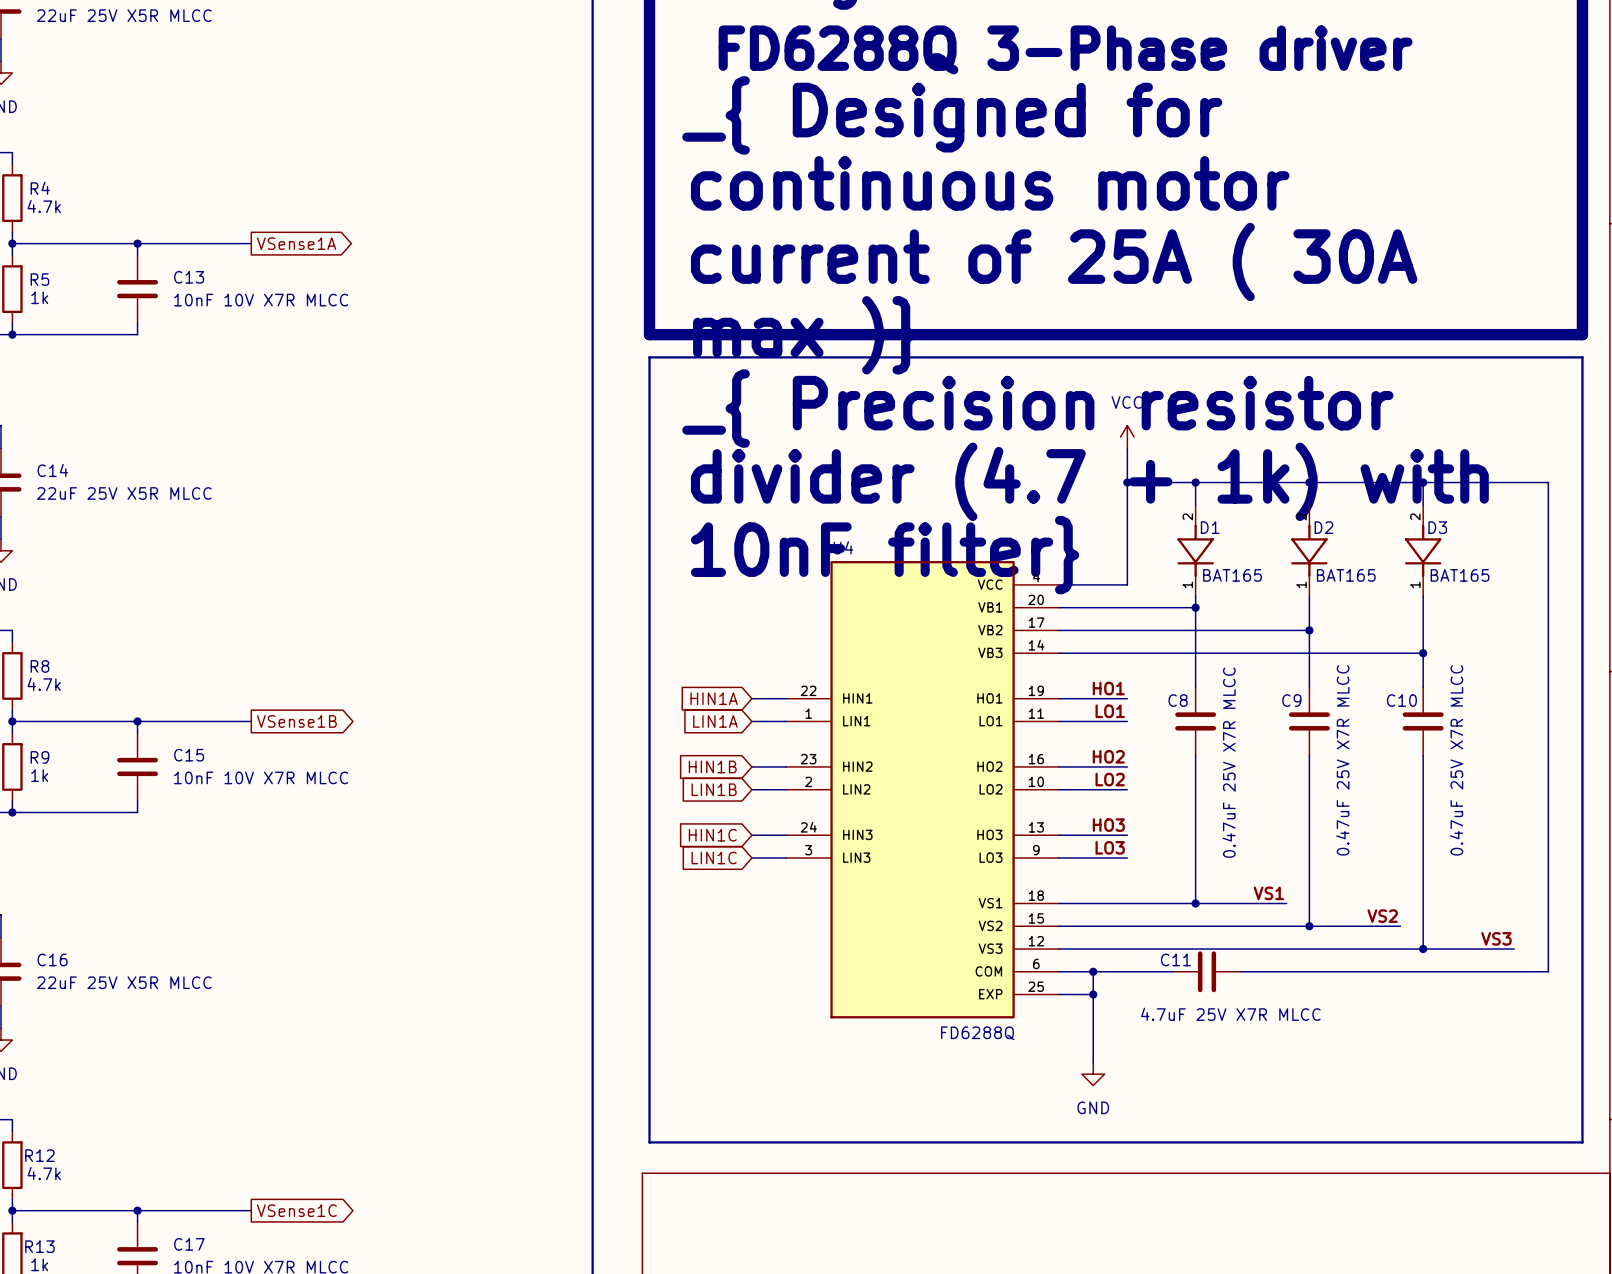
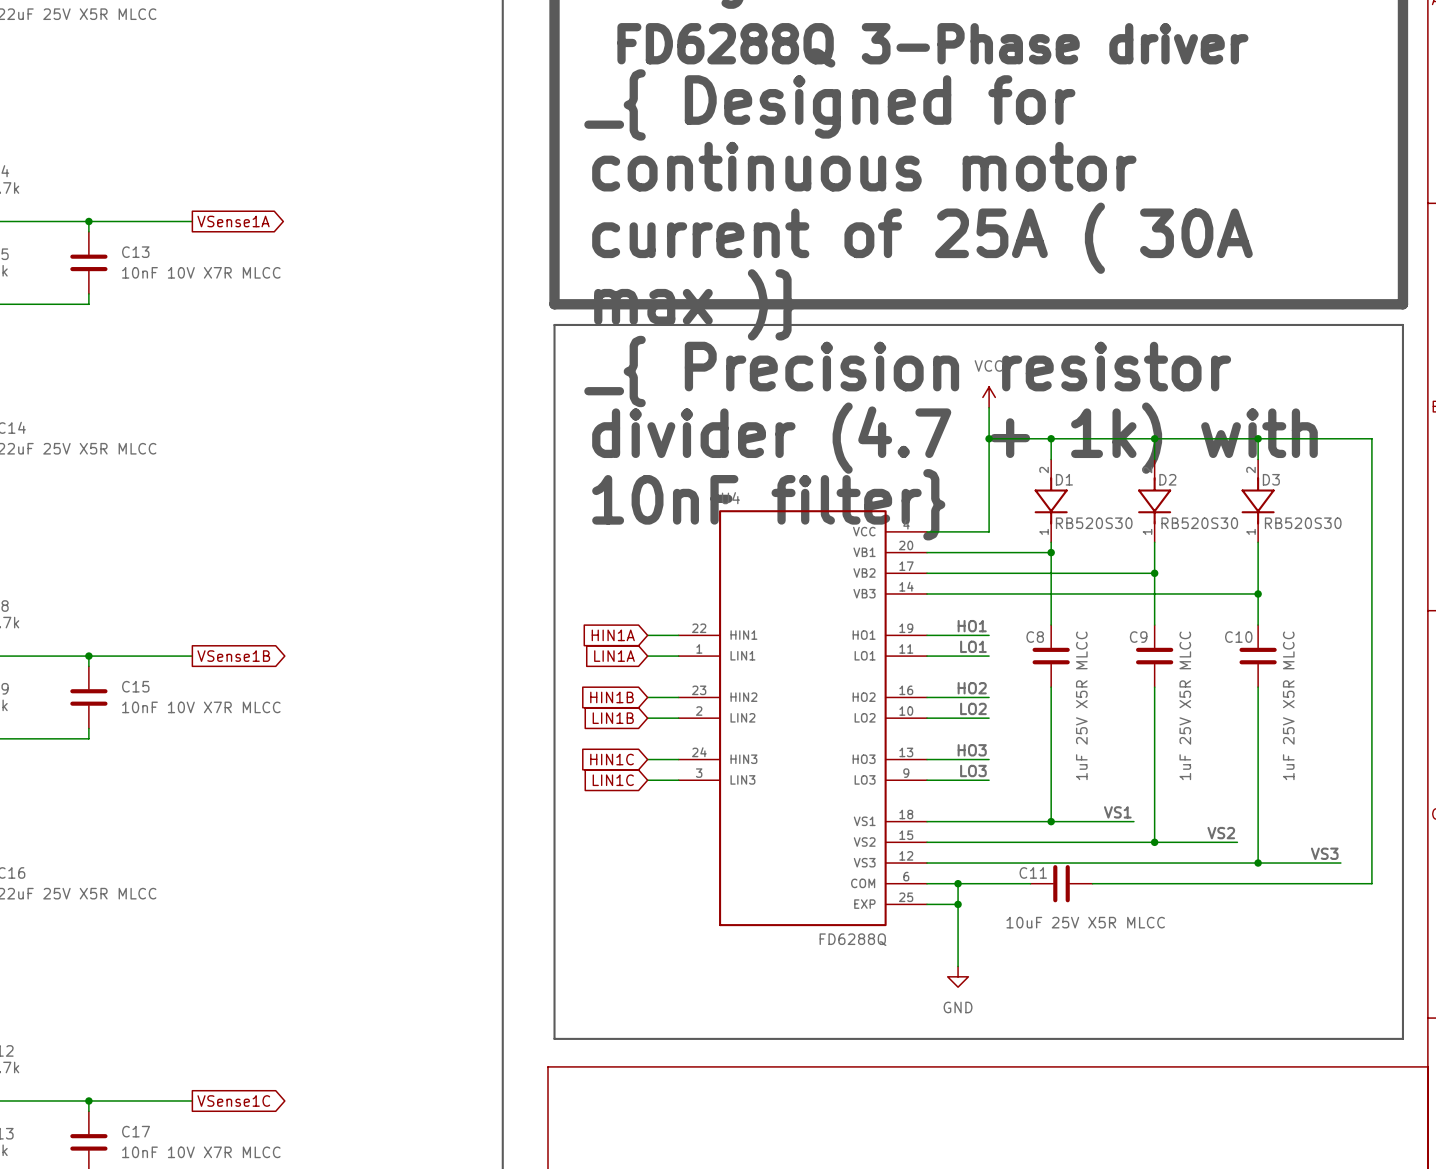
D1 value: BAT165 (1232, 575) -> RB520S30 (1094, 523)
D2 value: BAT165 (1346, 575) -> RB520S30 (1199, 523)
D3 value: BAT165 (1460, 575) -> RB520S30 (1303, 523)
C9 value: 0.47uF 25V X7R MLCC (1342, 760) -> 1uF 25V X5R MLCC (1185, 705)
C10 value: 0.47uF 25V X7R MLCC (1456, 760) -> 1uF 25V X5R MLCC (1288, 705)
C8 value: 0.47uF 25V X7R MLCC (1229, 762) -> 1uF 25V X5R MLCC (1081, 705)
C11 value: 4.7uF 25V X7R MLCC (1230, 1014) -> 10uF 25V X5R MLCC (1085, 922)

